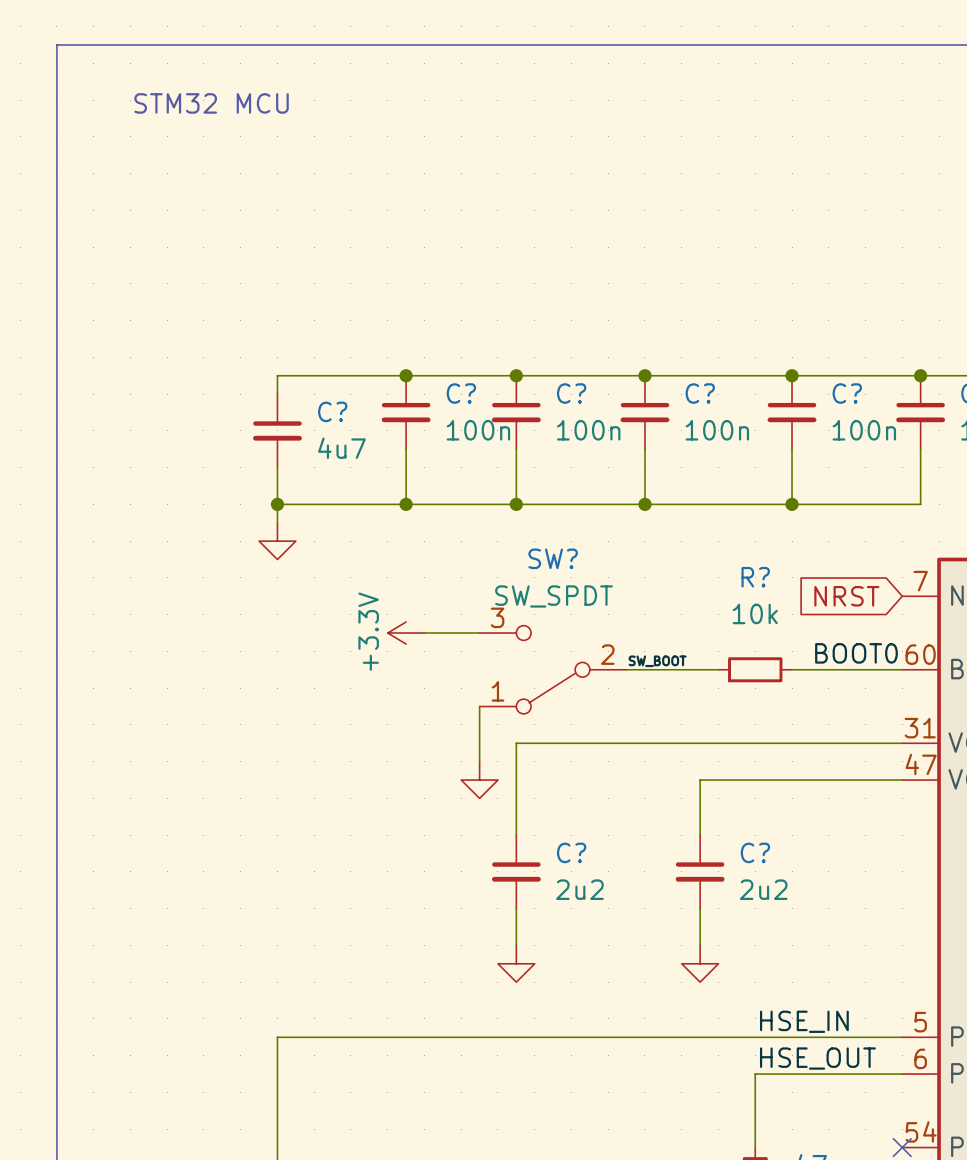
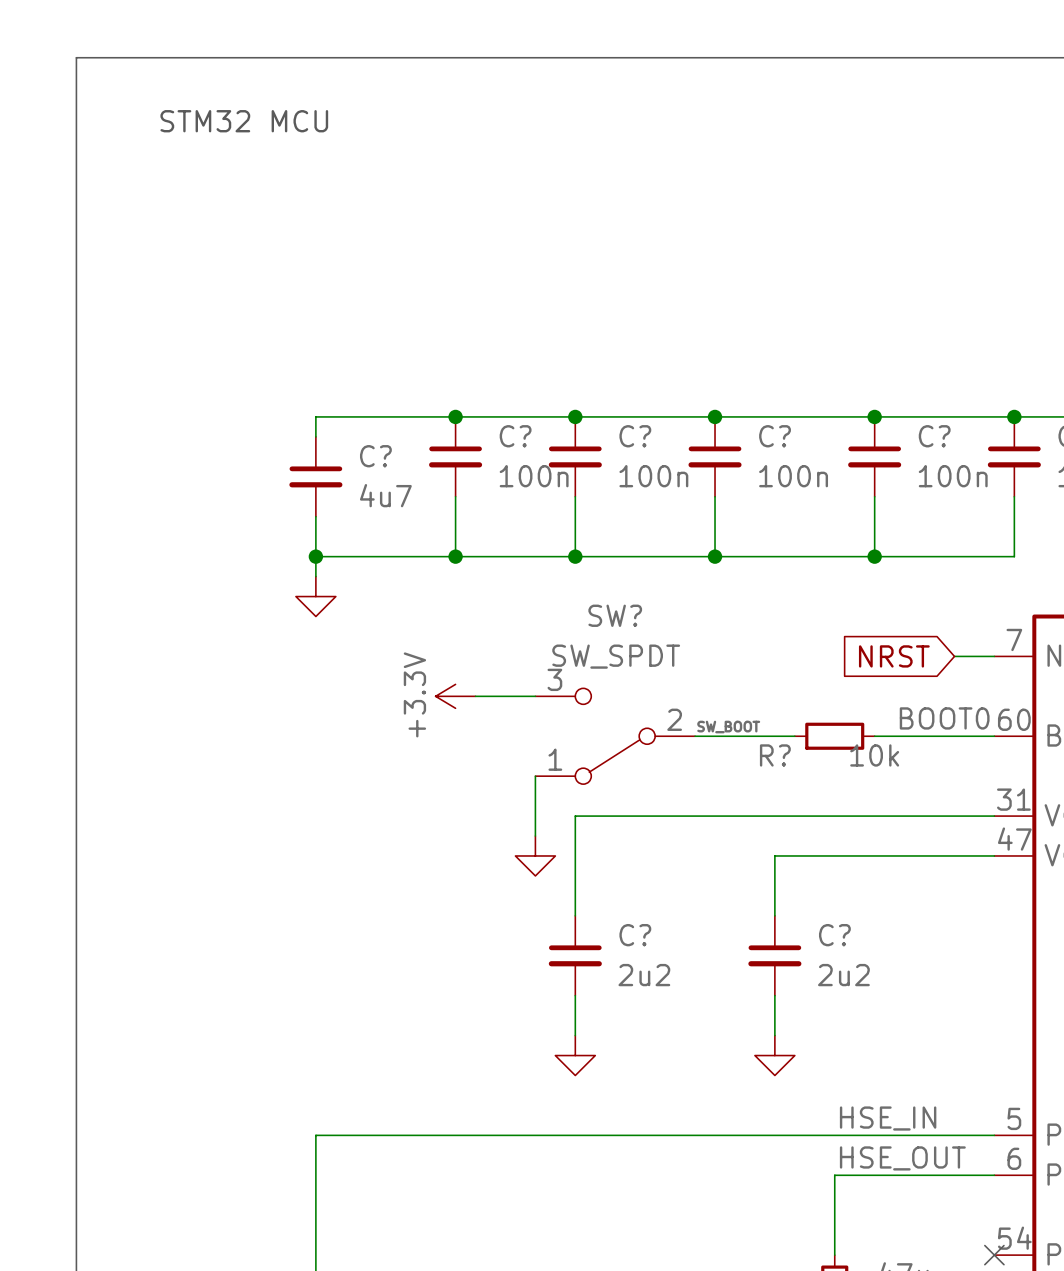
R? name position: R? (755, 577) -> R? (775, 755)
global label position: NRST (846, 596) -> NRST (894, 656)
wire: none -> (954, 656) (994, 656)
R? value position: 10k (755, 613) -> 10k (874, 755)

